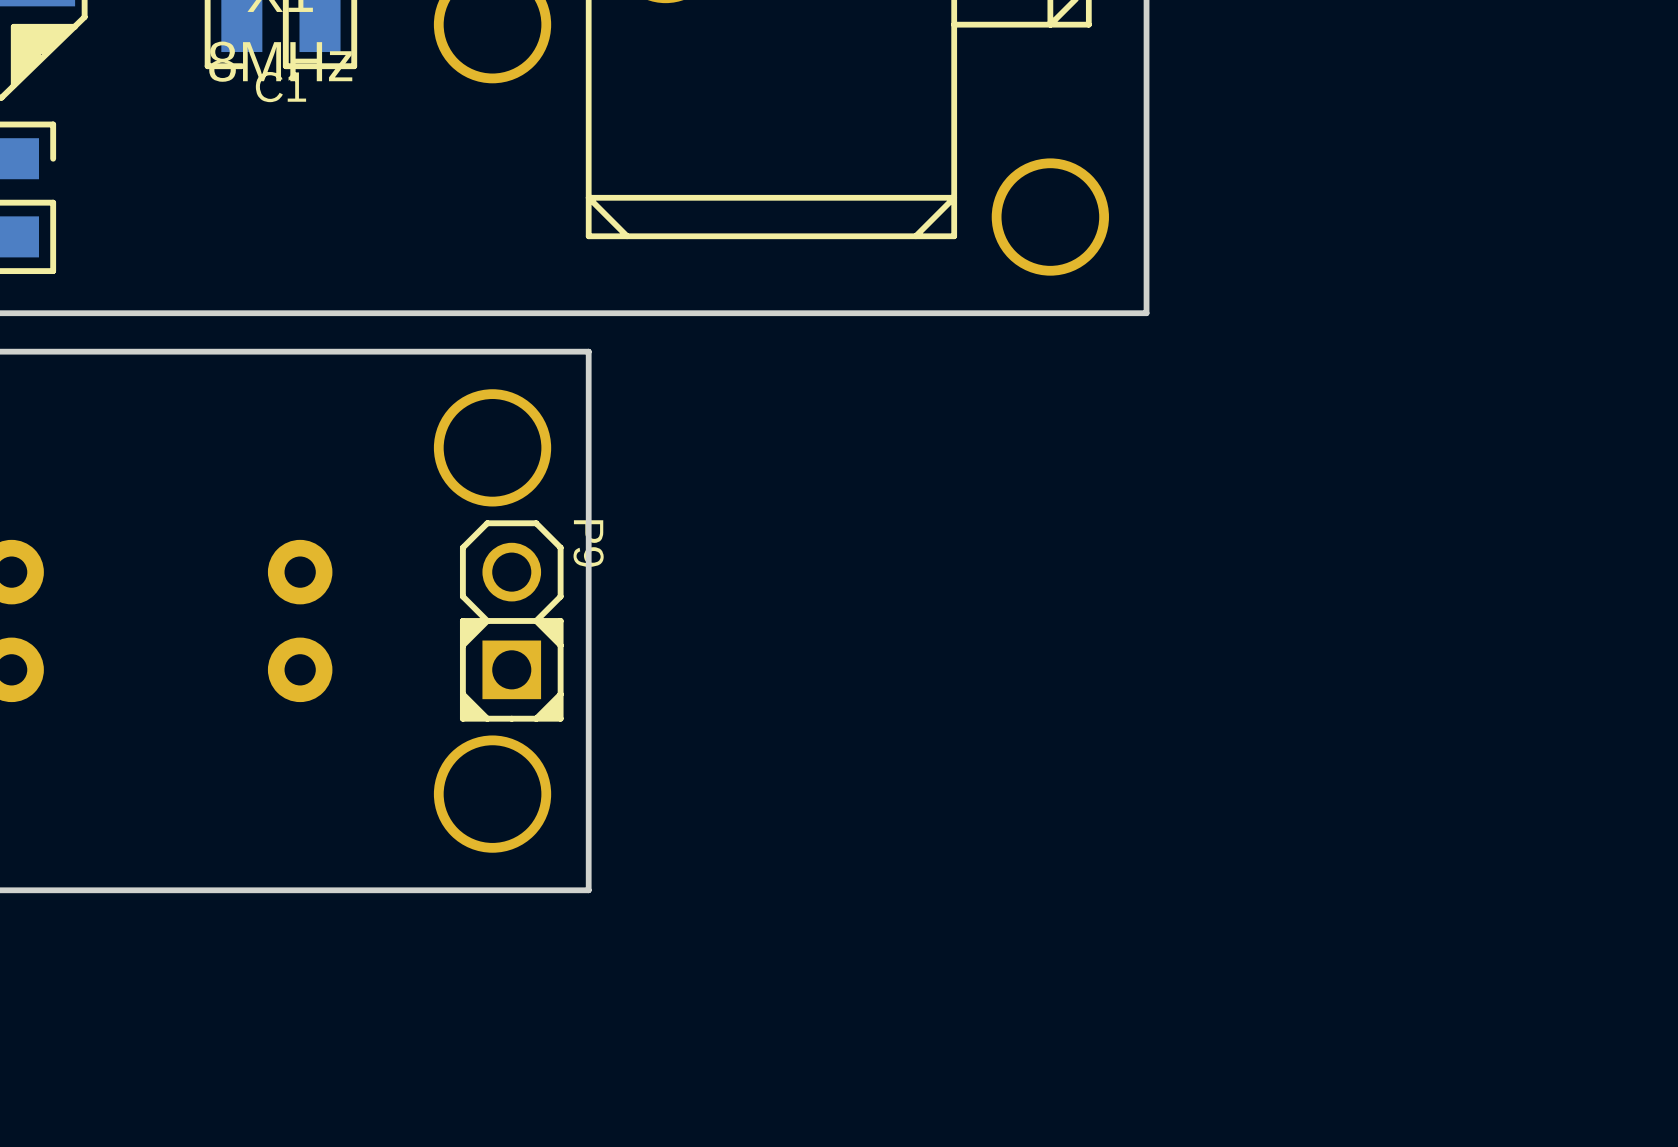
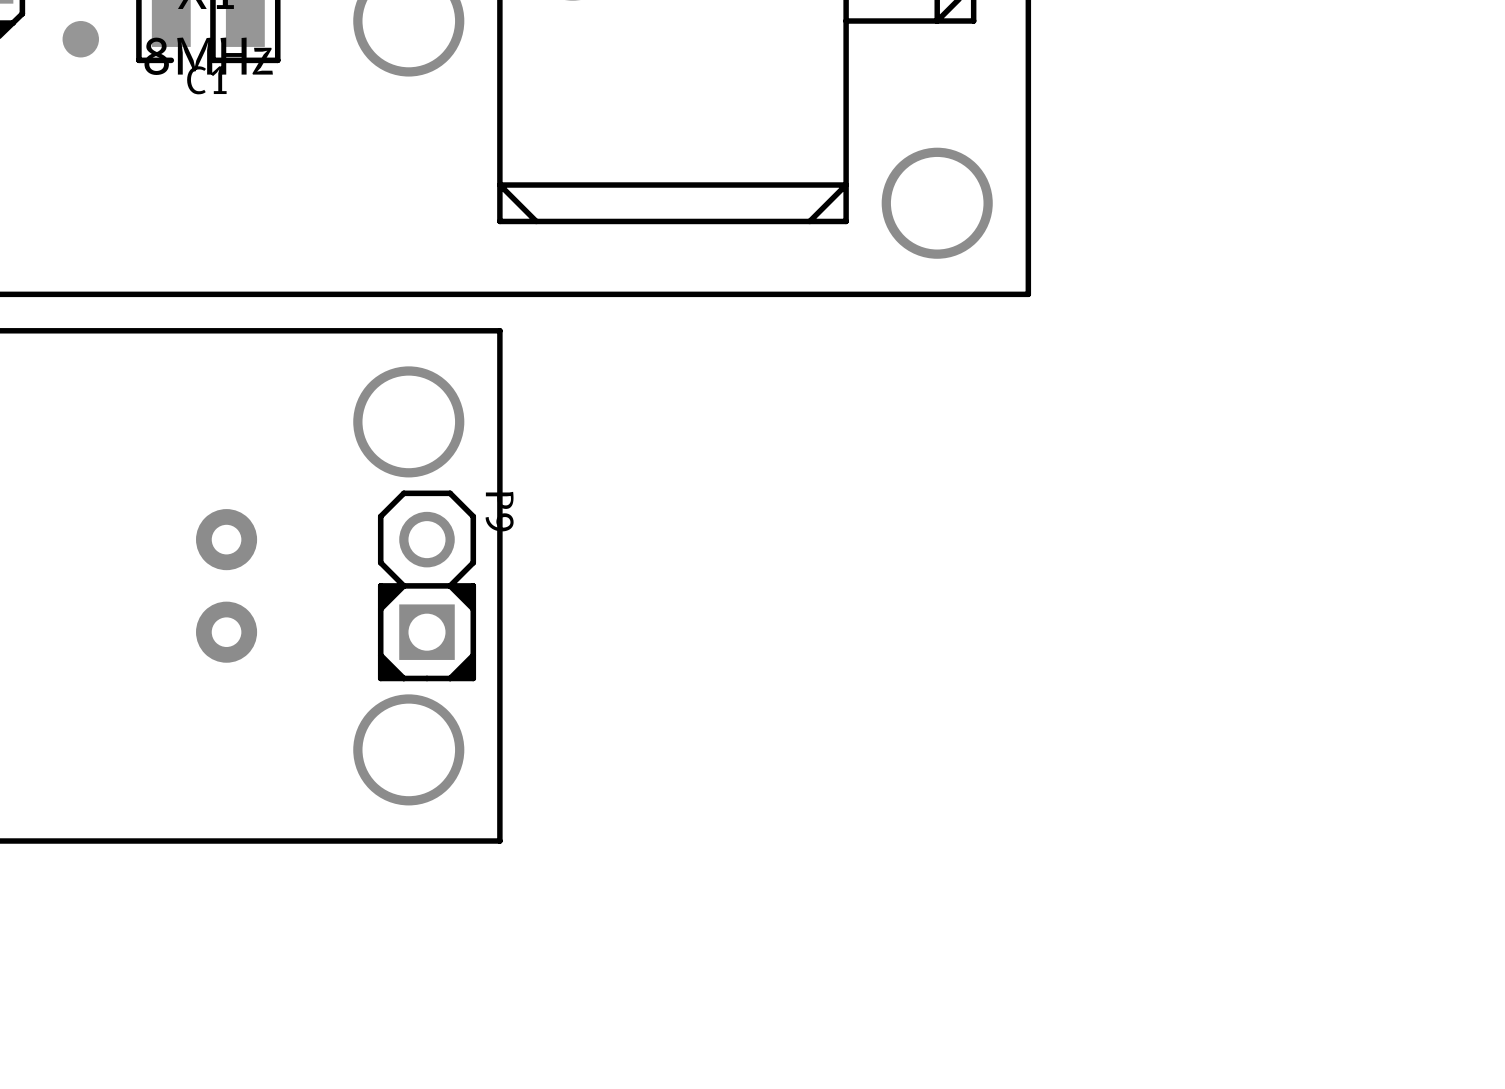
part: none -> (80, 39)

